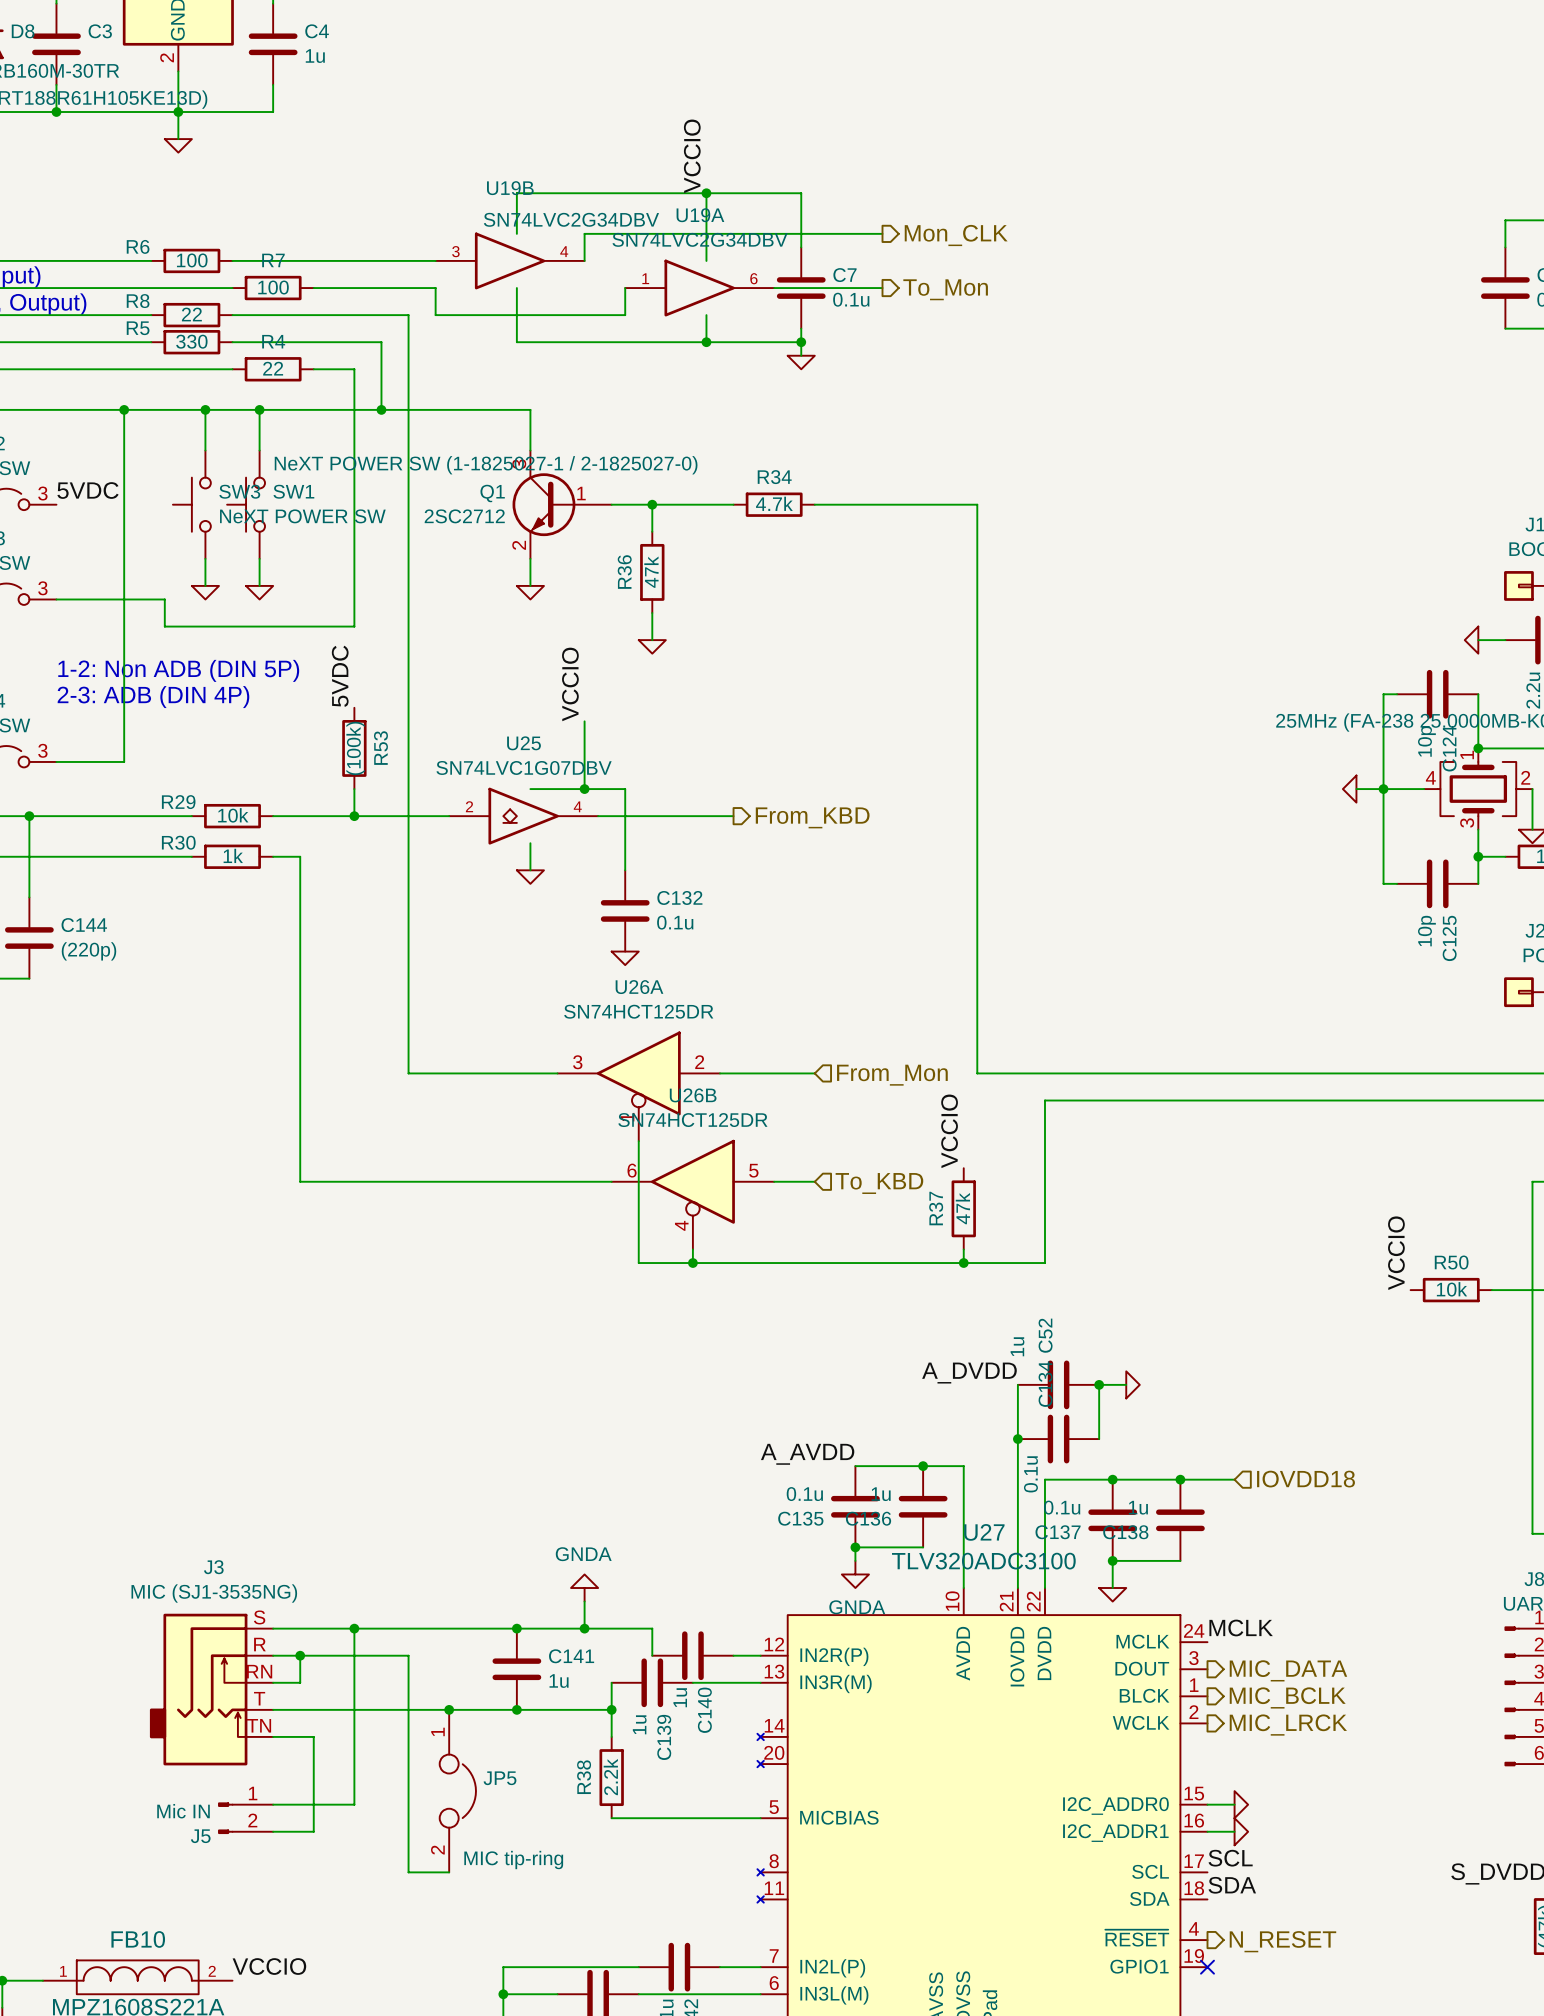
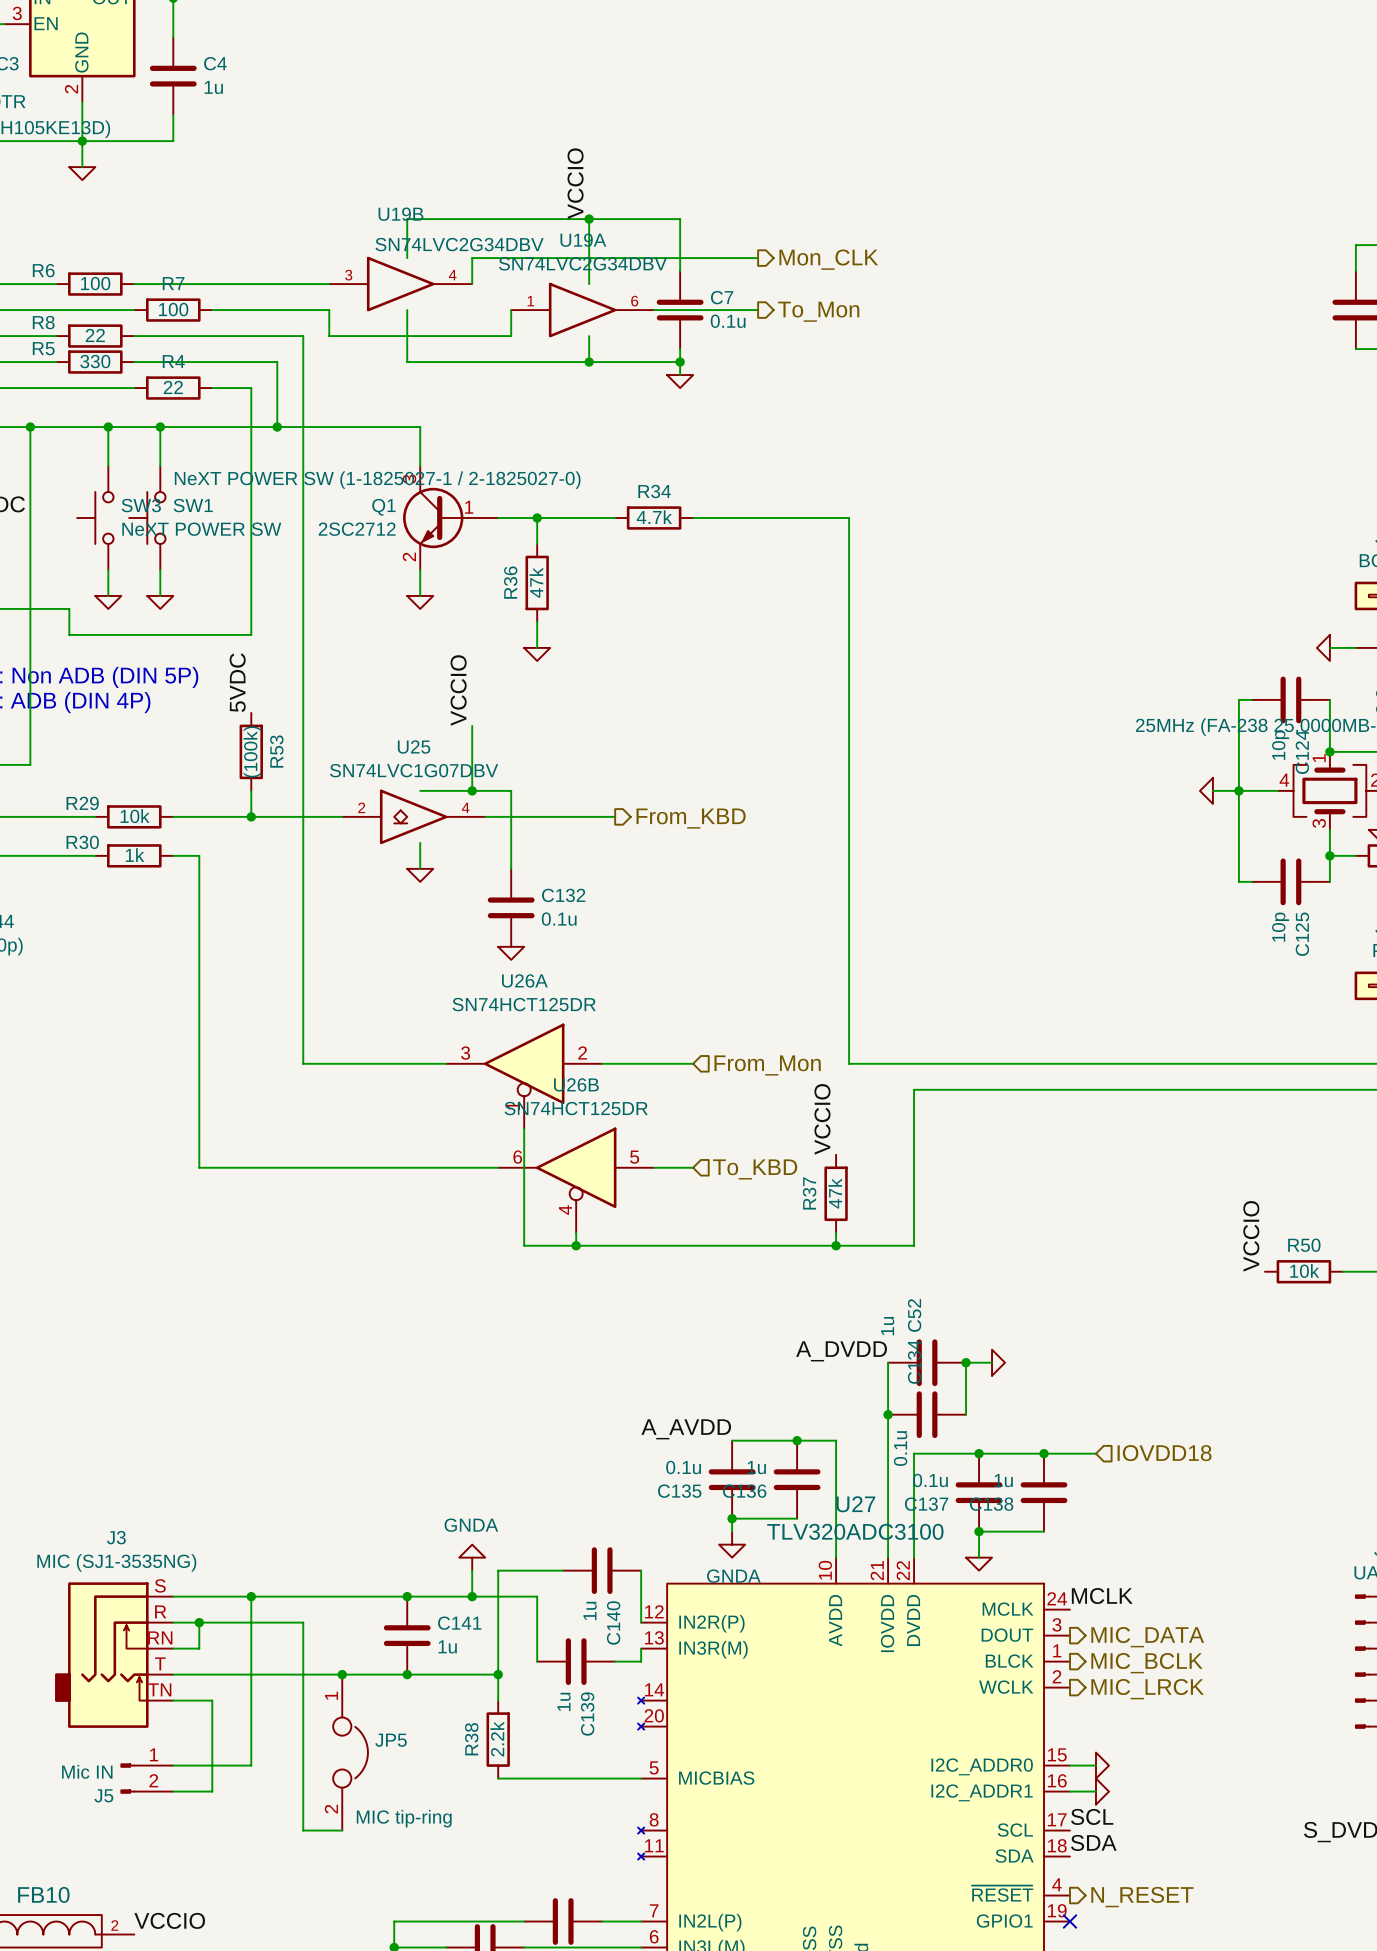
wire: none -> (563, 1570) (498, 1570) (498, 1648)
wire: none -> (537, 1622) (537, 1661)
C140 position: (692, 1655) -> (602, 1570)
wire: (733, 1655) (760, 1655) -> (641, 1570) (641, 1622)
C139 position: (652, 1682) -> (576, 1661)
wire: (692, 1682) (760, 1682) -> (615, 1661) (641, 1661) (641, 1648)

